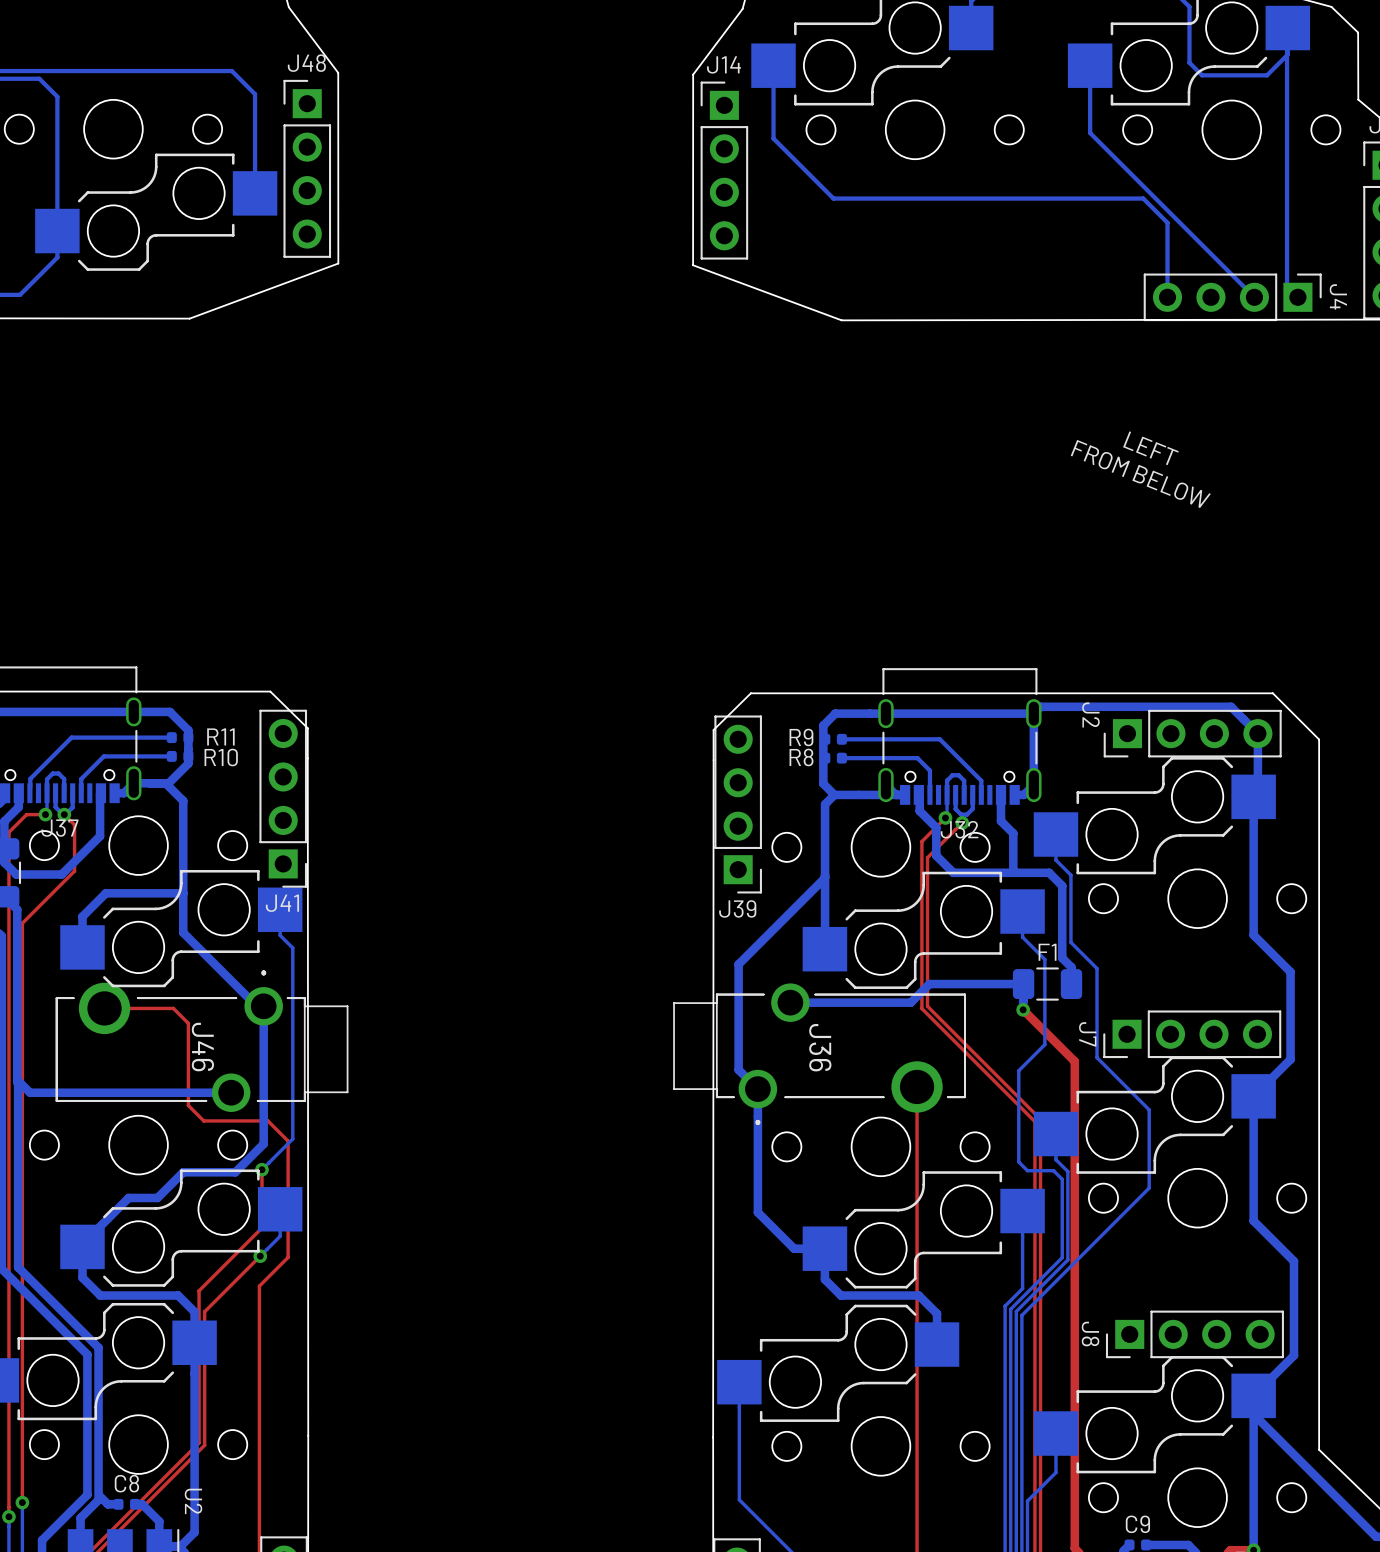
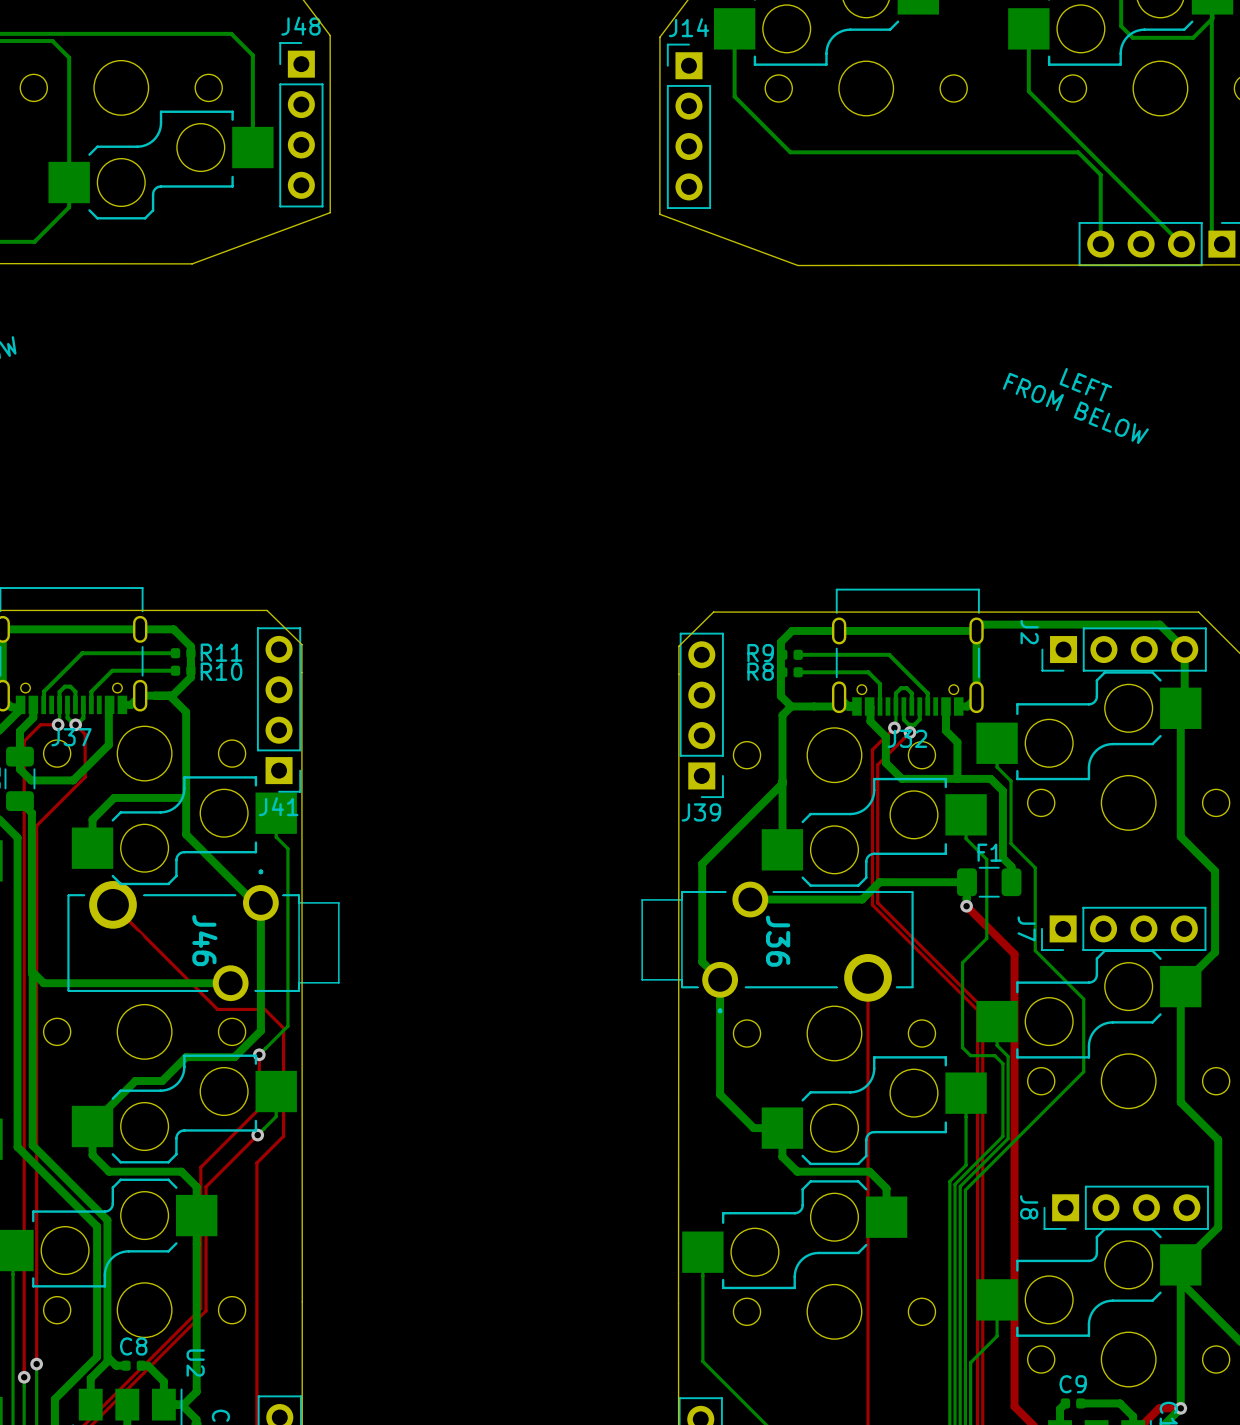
top track: (104, 1008) (173, 1008) (188, 1023) (188, 1105) (203, 1120) (217, 1120) -> (113, 904) (217, 1009)

